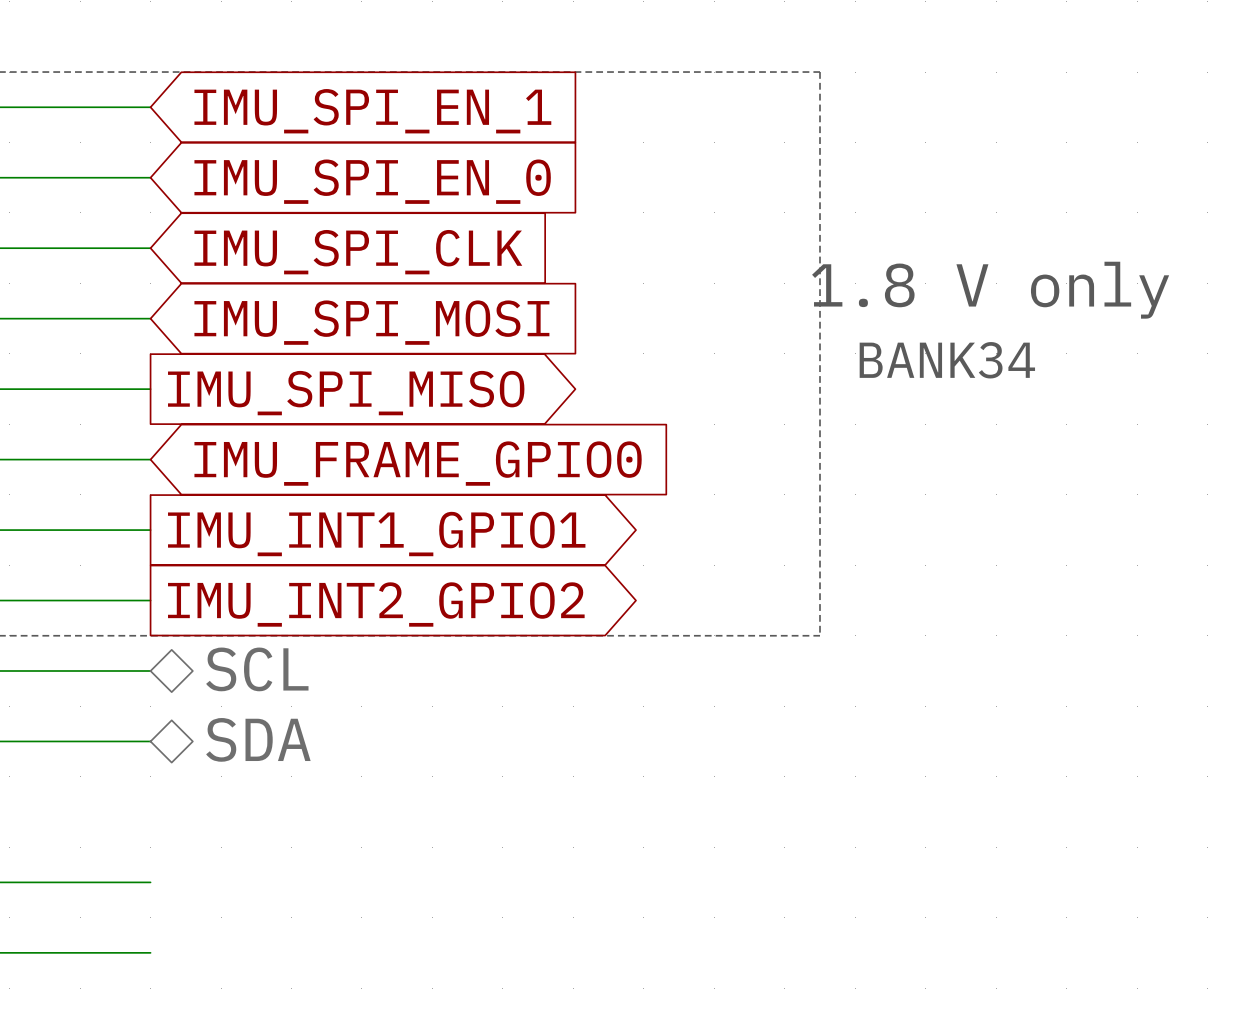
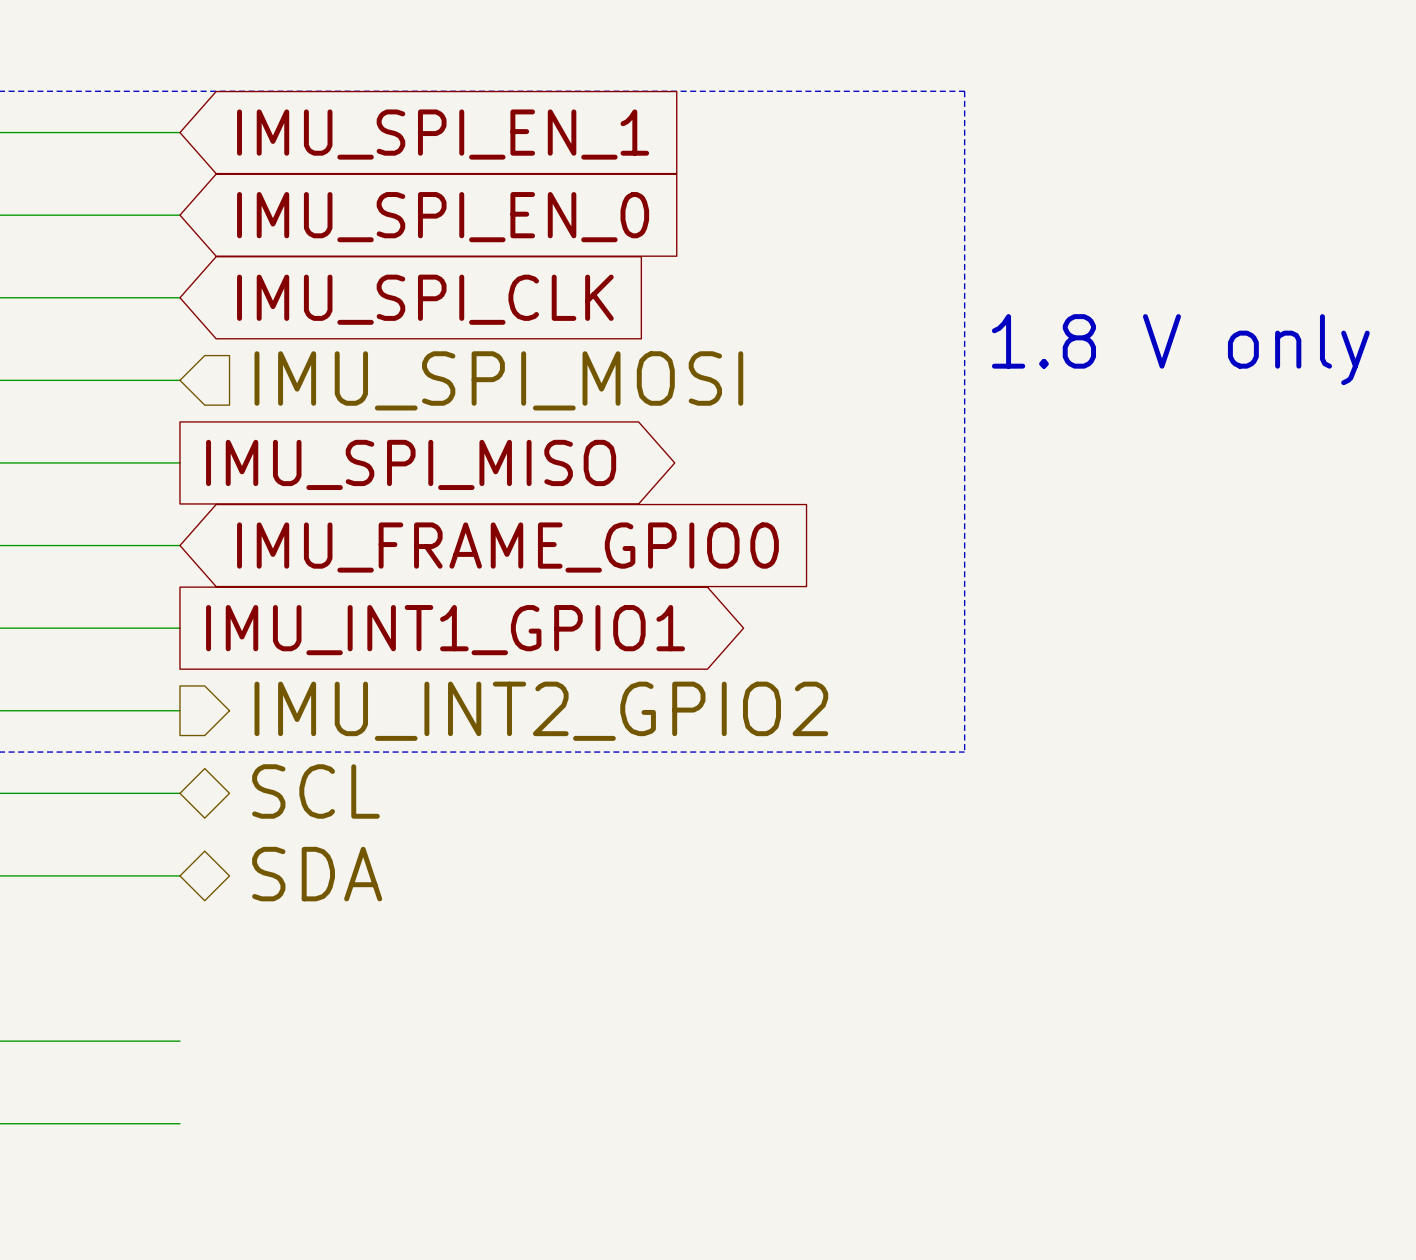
hierarchical label: none -> IMU_SPI_MOSI (498, 380)
global label: IMU_SPI_MOSI (371, 322) -> none
text: BANK34 (947, 360) -> none
hierarchical label: none -> IMU_INT2_GPIO2 (541, 711)
global label: IMU_INT2_GPIO2 (376, 604) -> none

